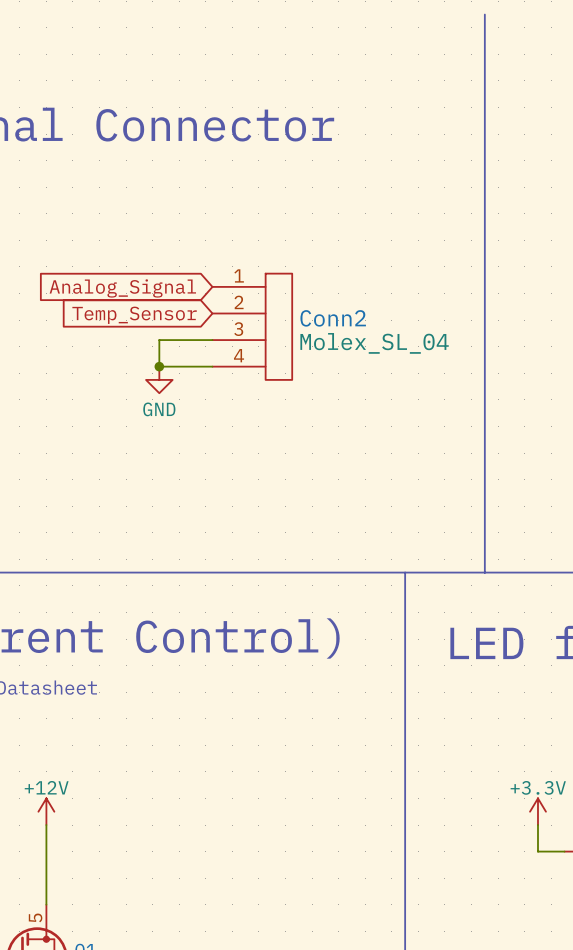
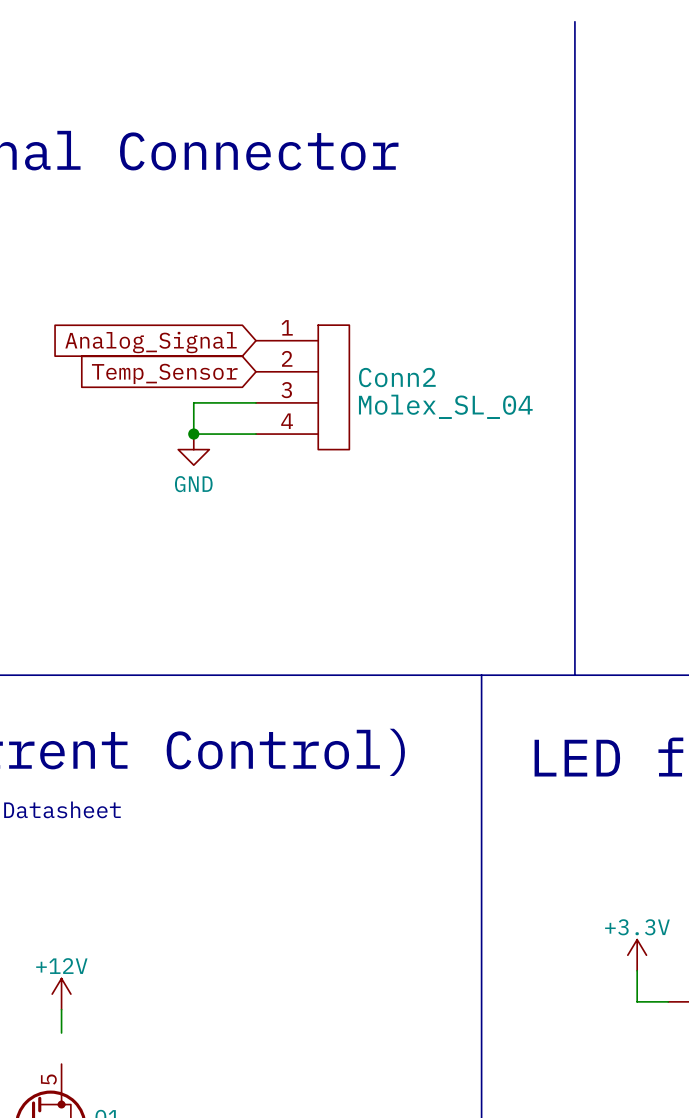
power symbol position: +12V (46, 811) -> +12V (61, 994)
wire: (46, 878) (46, 904) -> none

